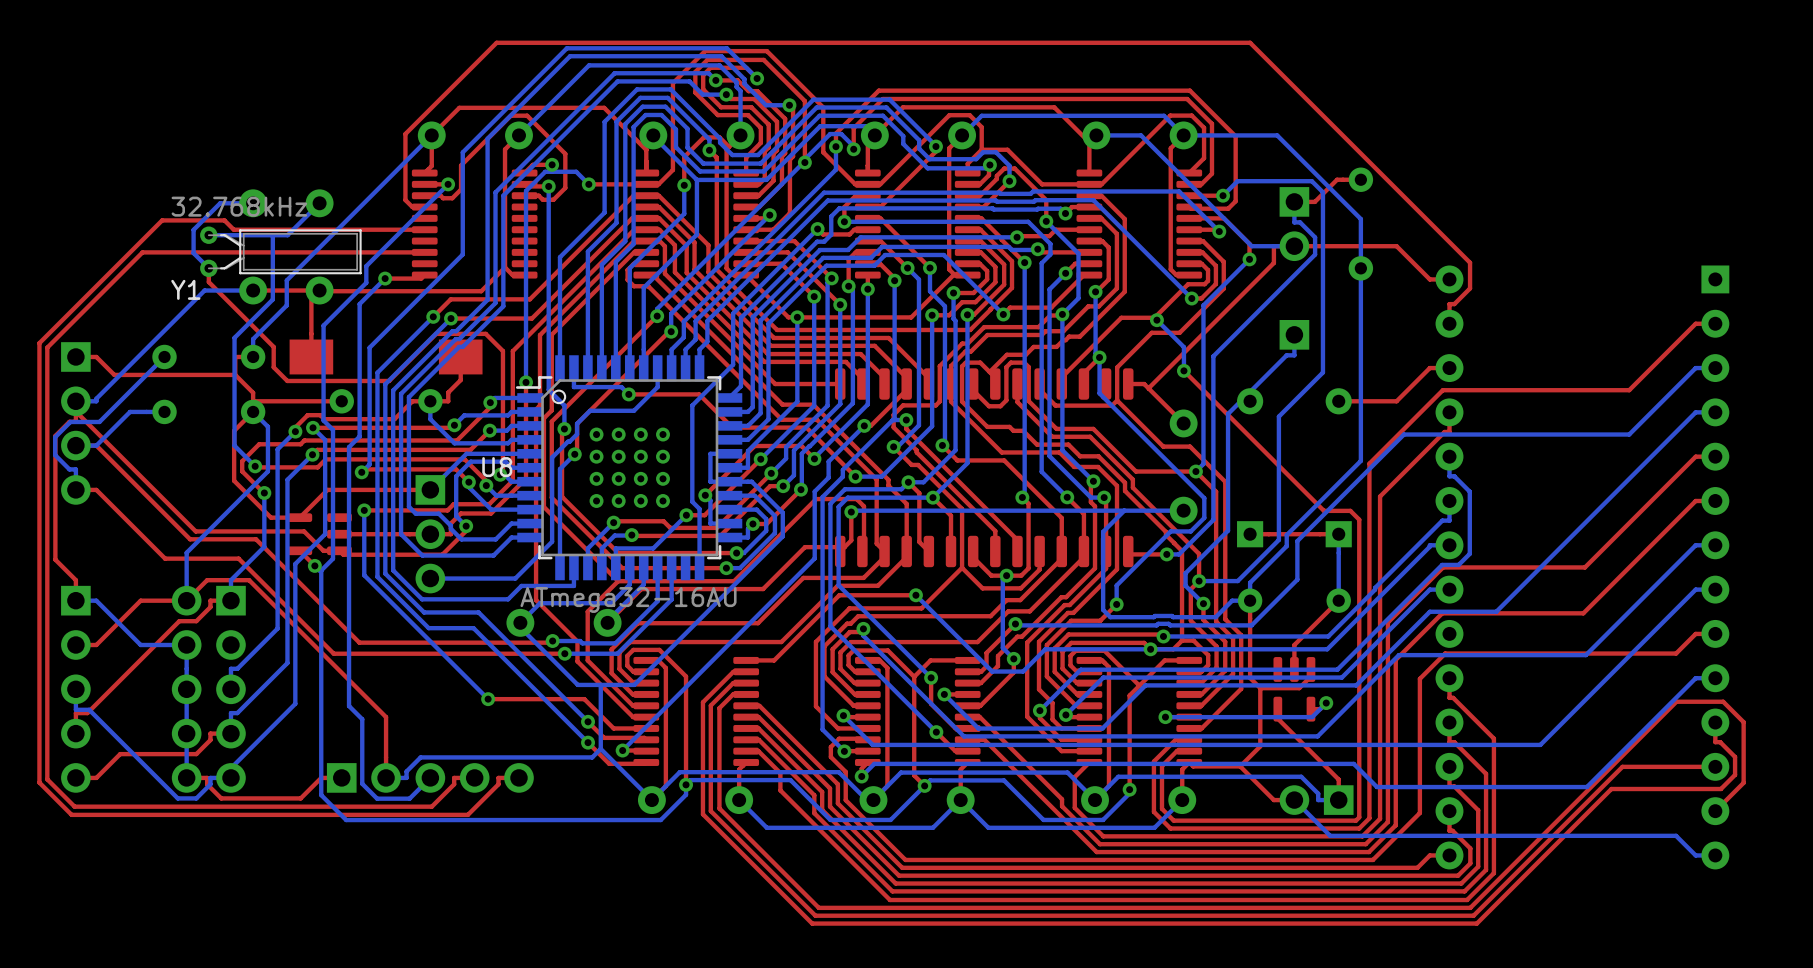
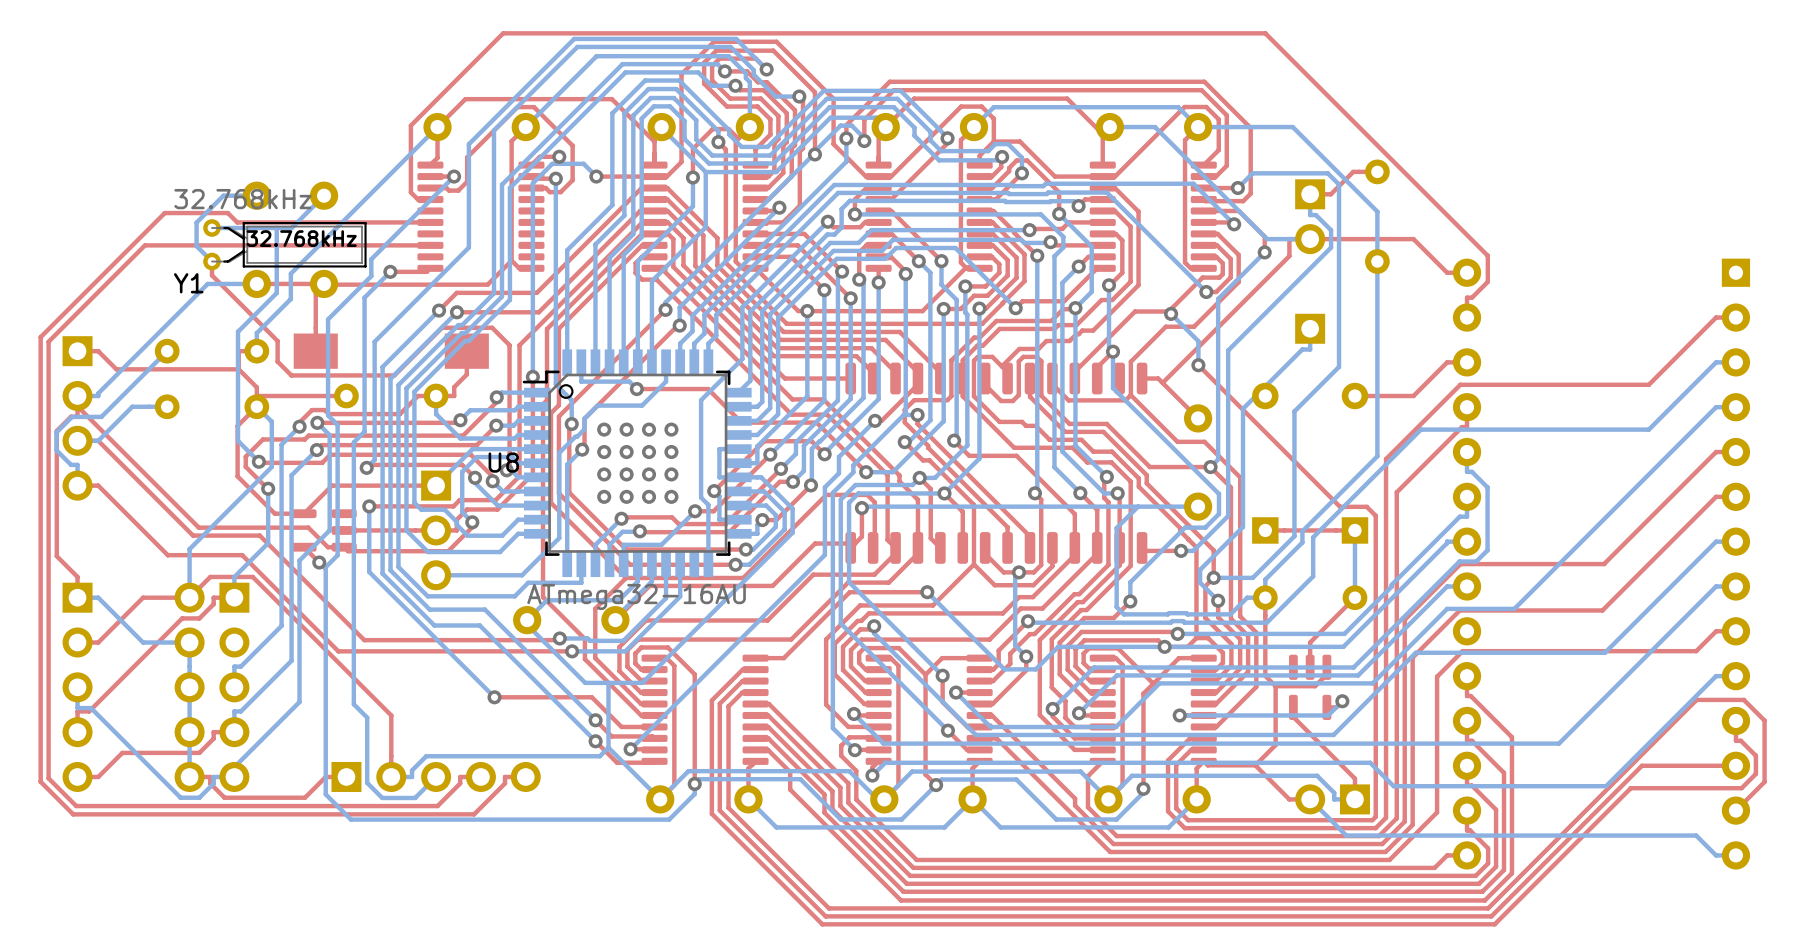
text: none -> 32.768kHz (301, 238)

